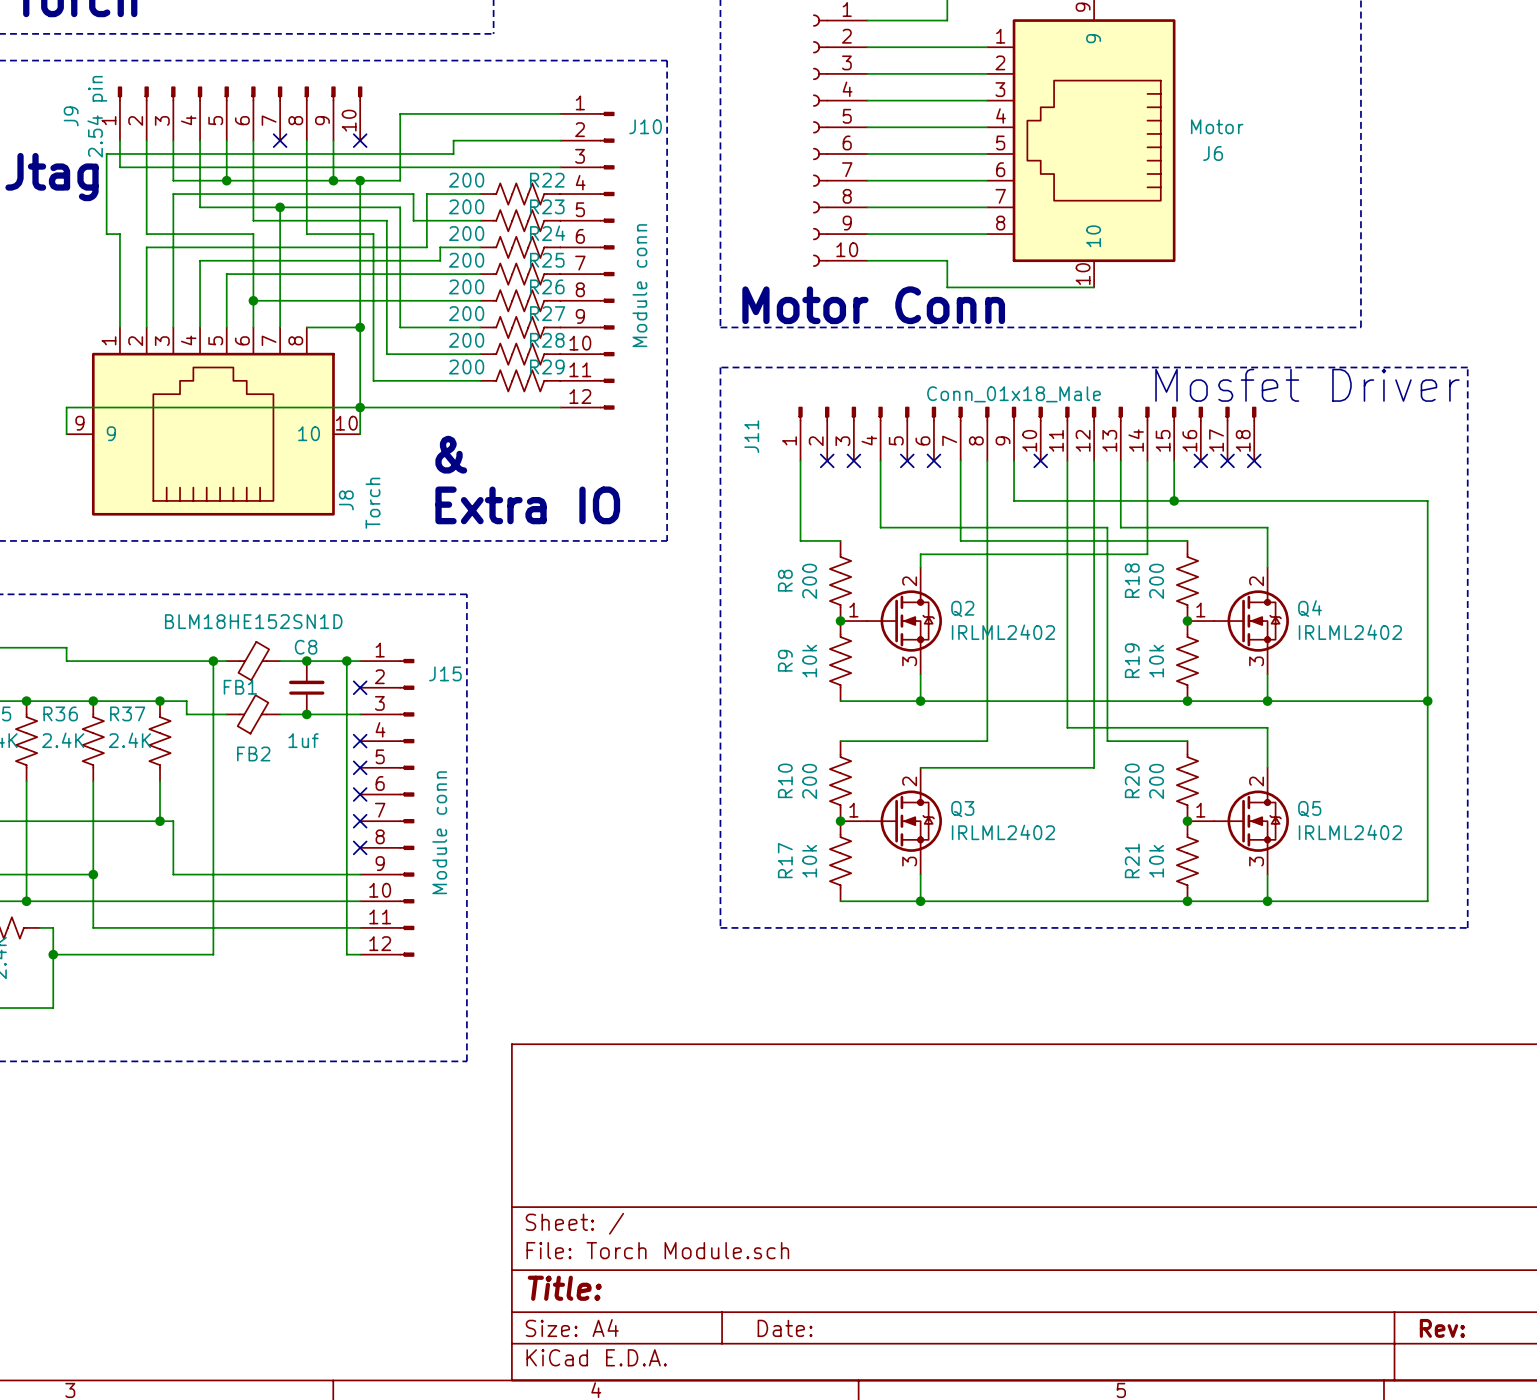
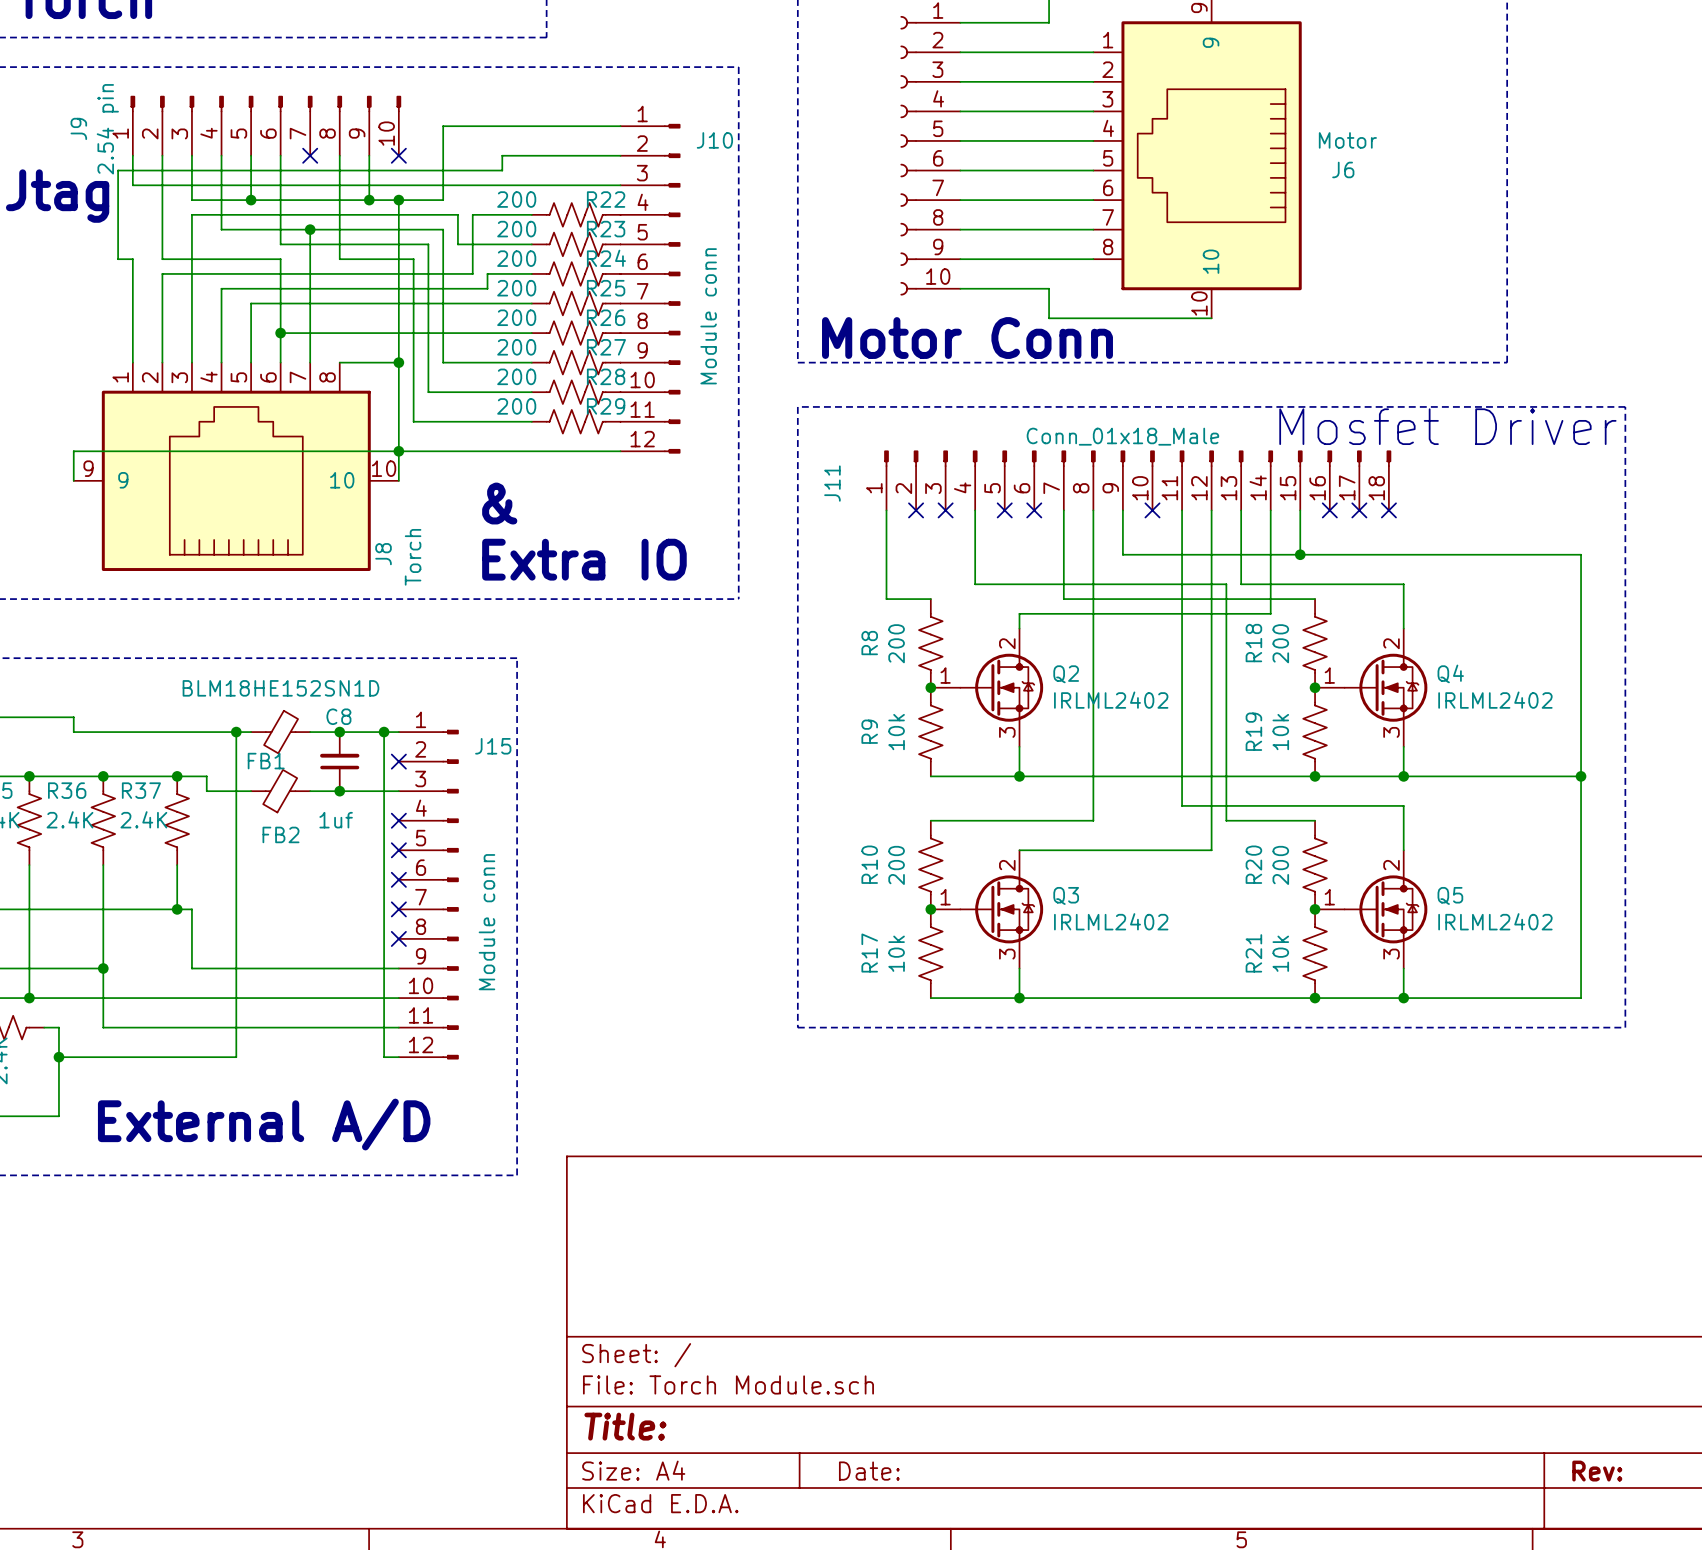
text: none -> External A/D (264, 1124)

